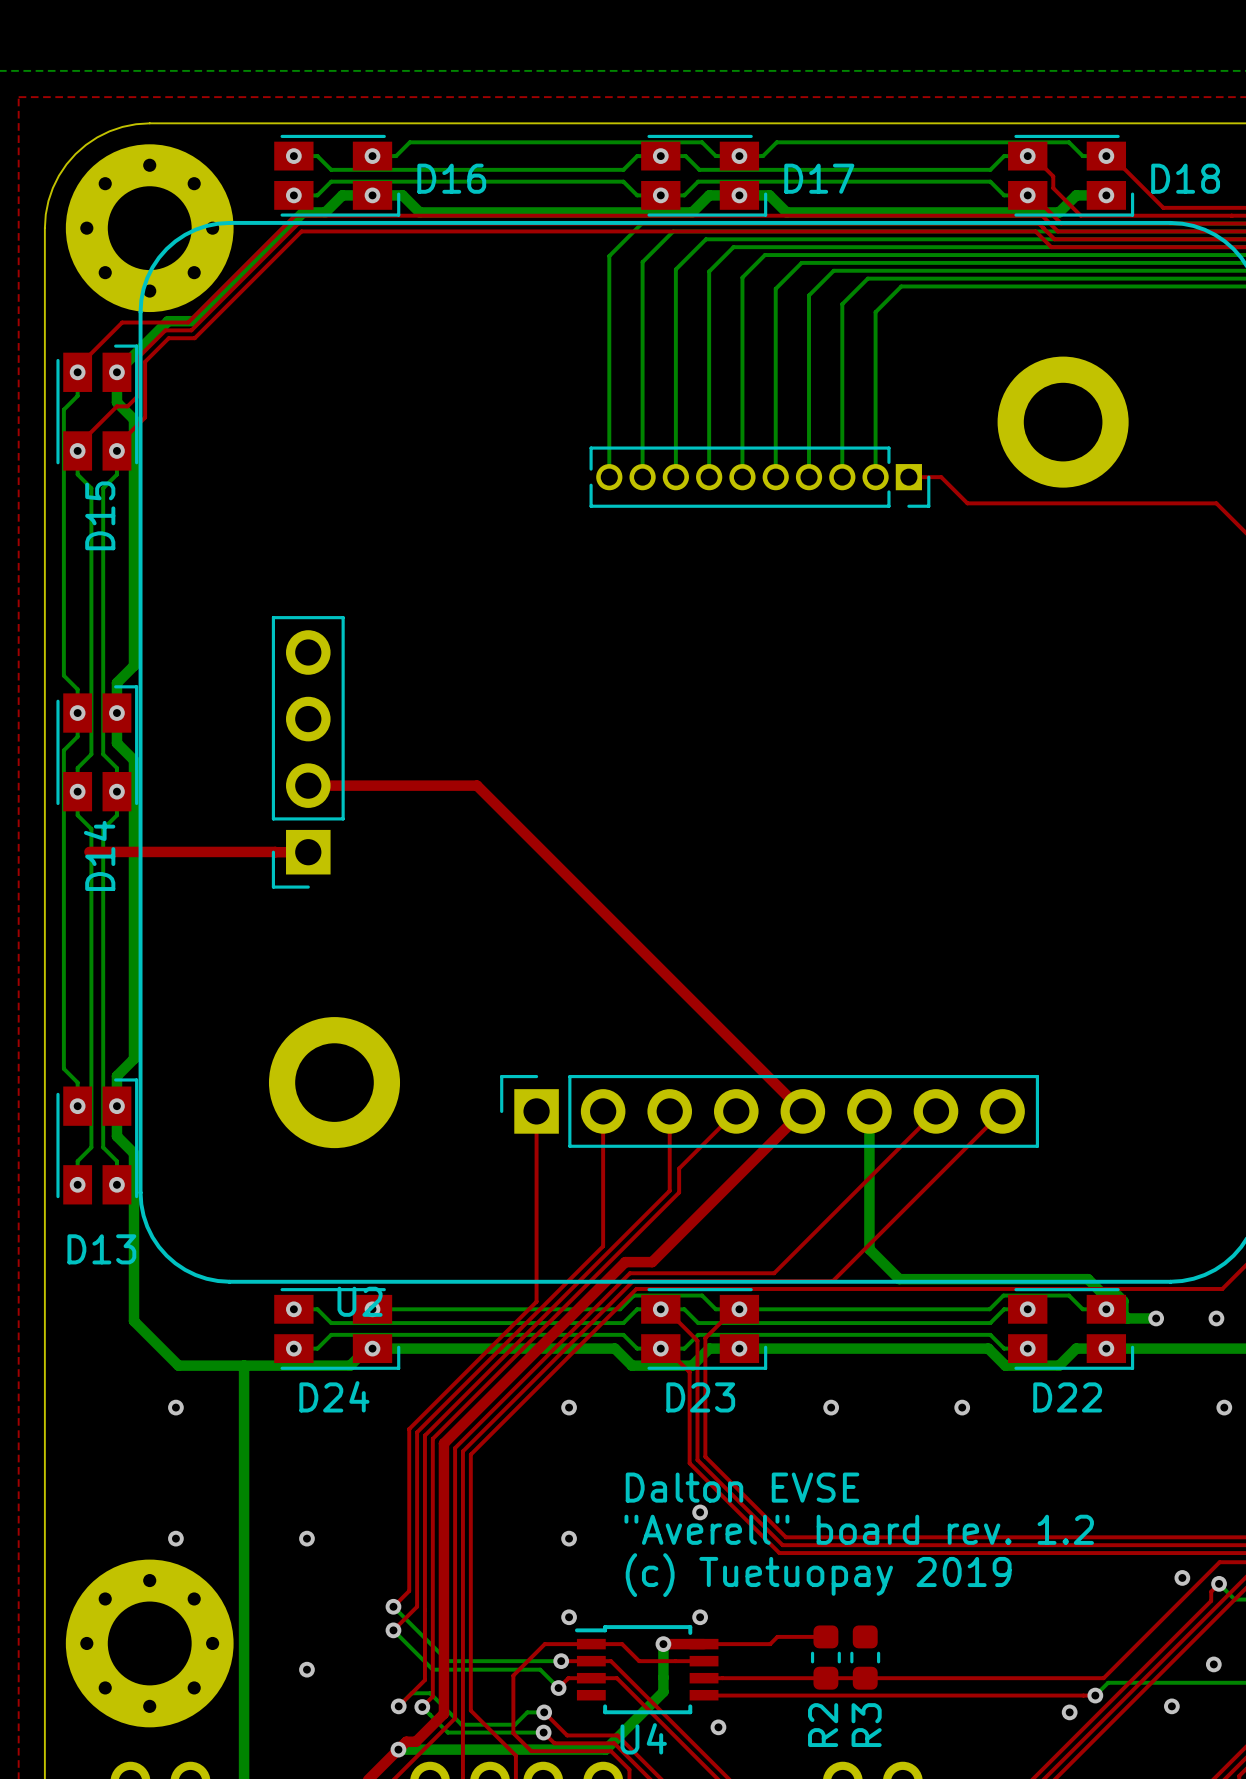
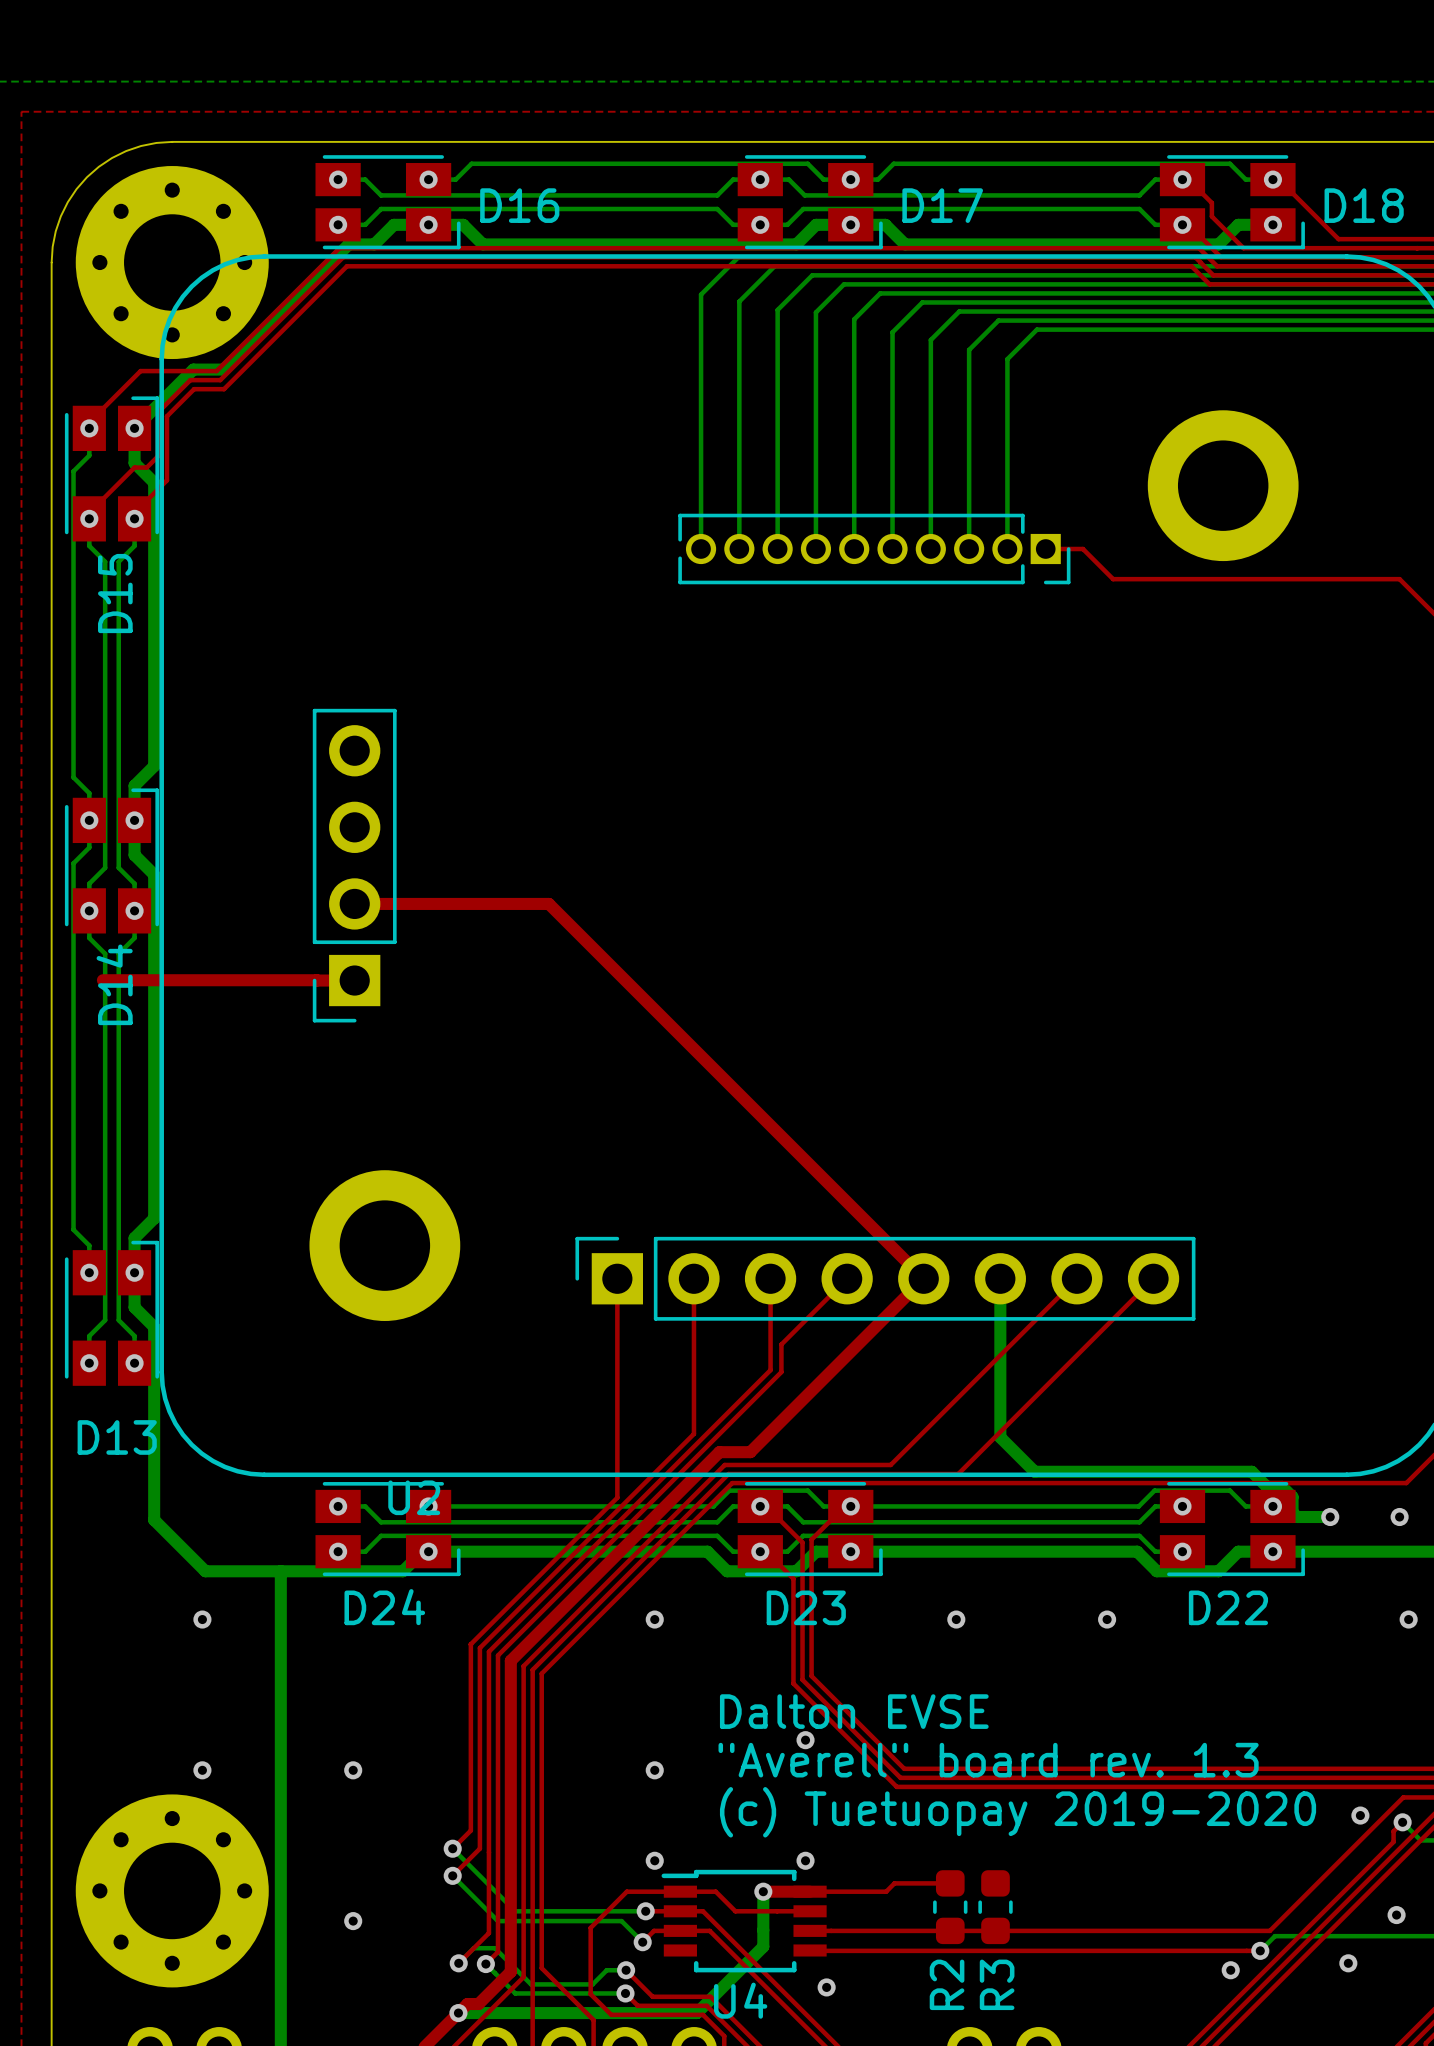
text: "Averell" board rev. 1.2 (859, 1529) -> "Averell" board rev. 1.3 (988, 1760)
text: (c) Tuetuopay 2019 (818, 1575) -> (c) Tuetuopay 2019-2020 (1018, 1812)

